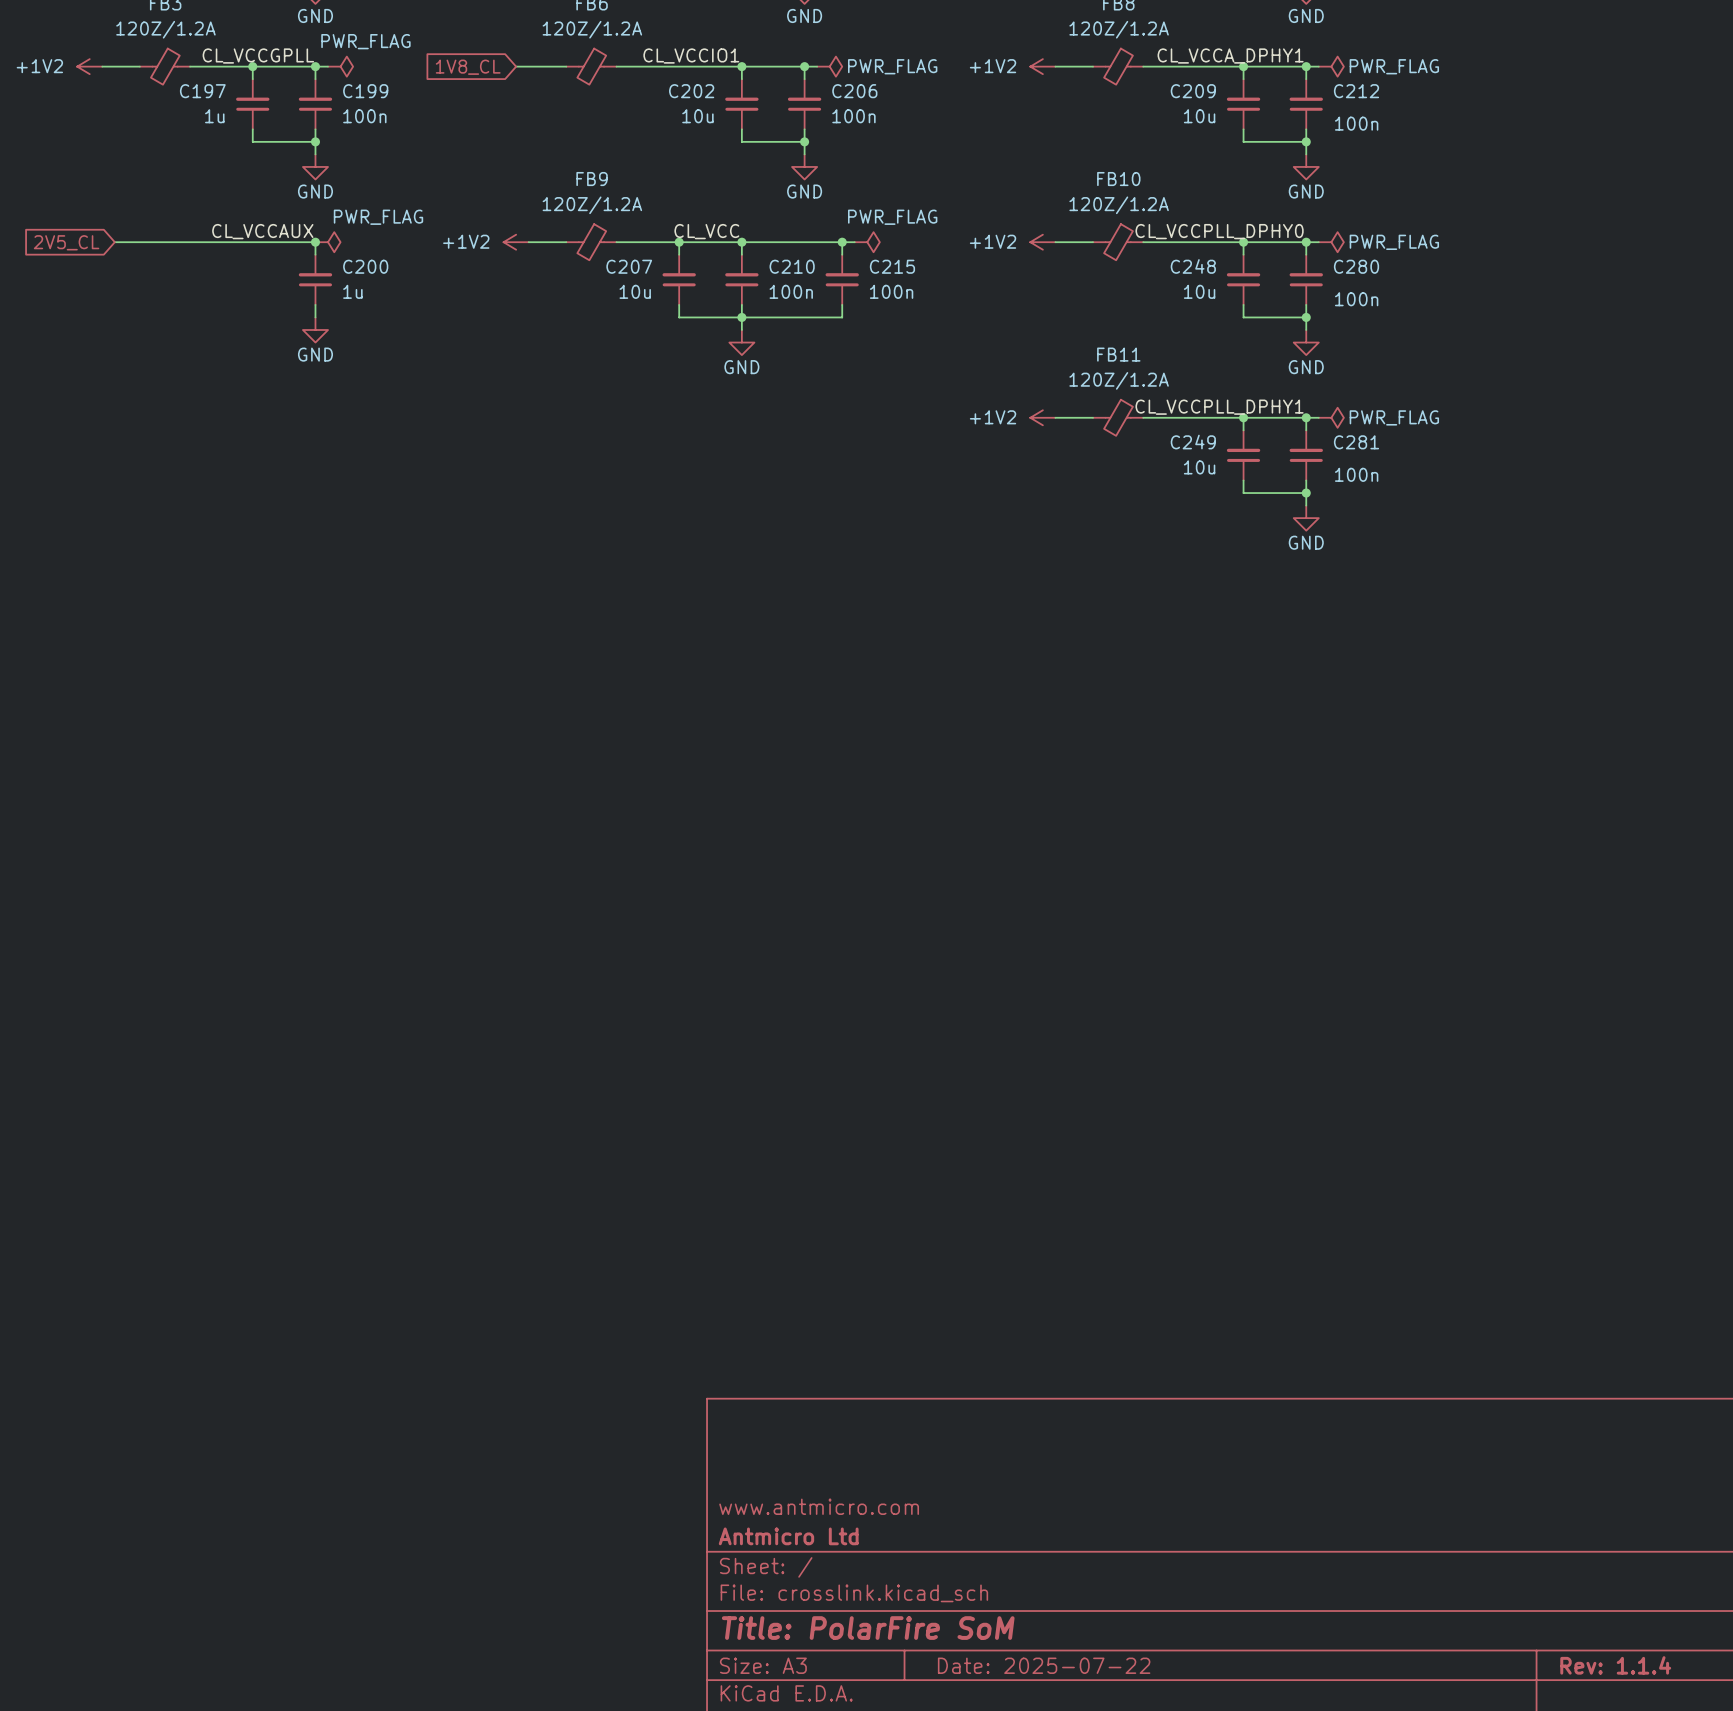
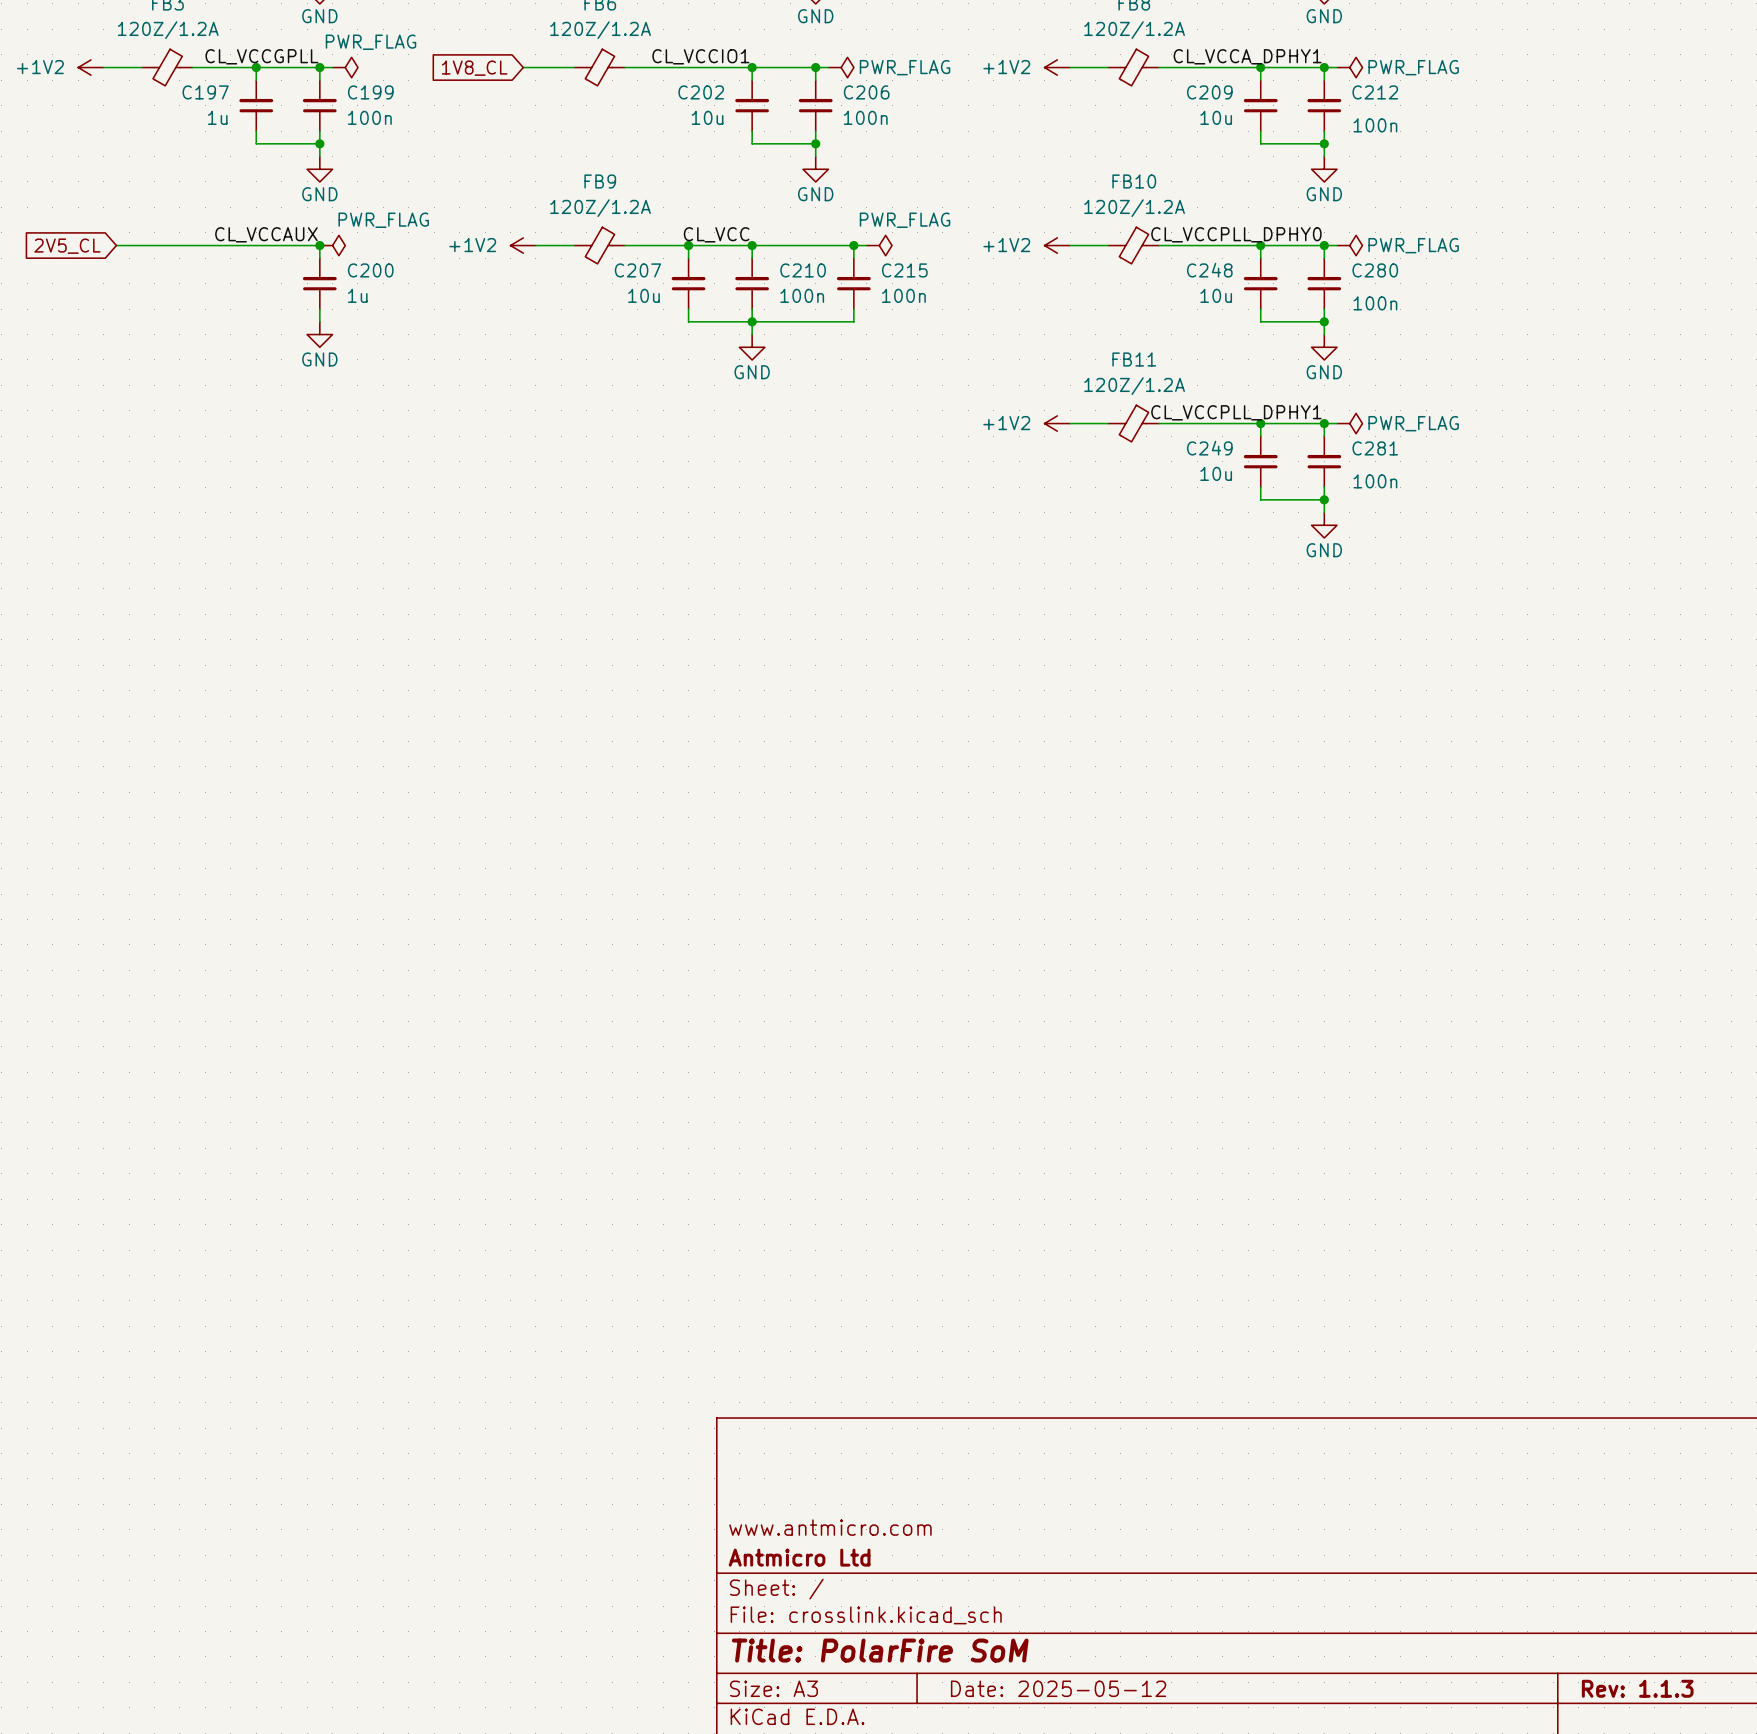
title block: Date: 2025-07-22 (1044, 1665) -> Date: 2025-05-12 (1058, 1688)
title block: Rev: 1.1.4 (1615, 1665) -> Rev: 1.1.3 (1637, 1688)

